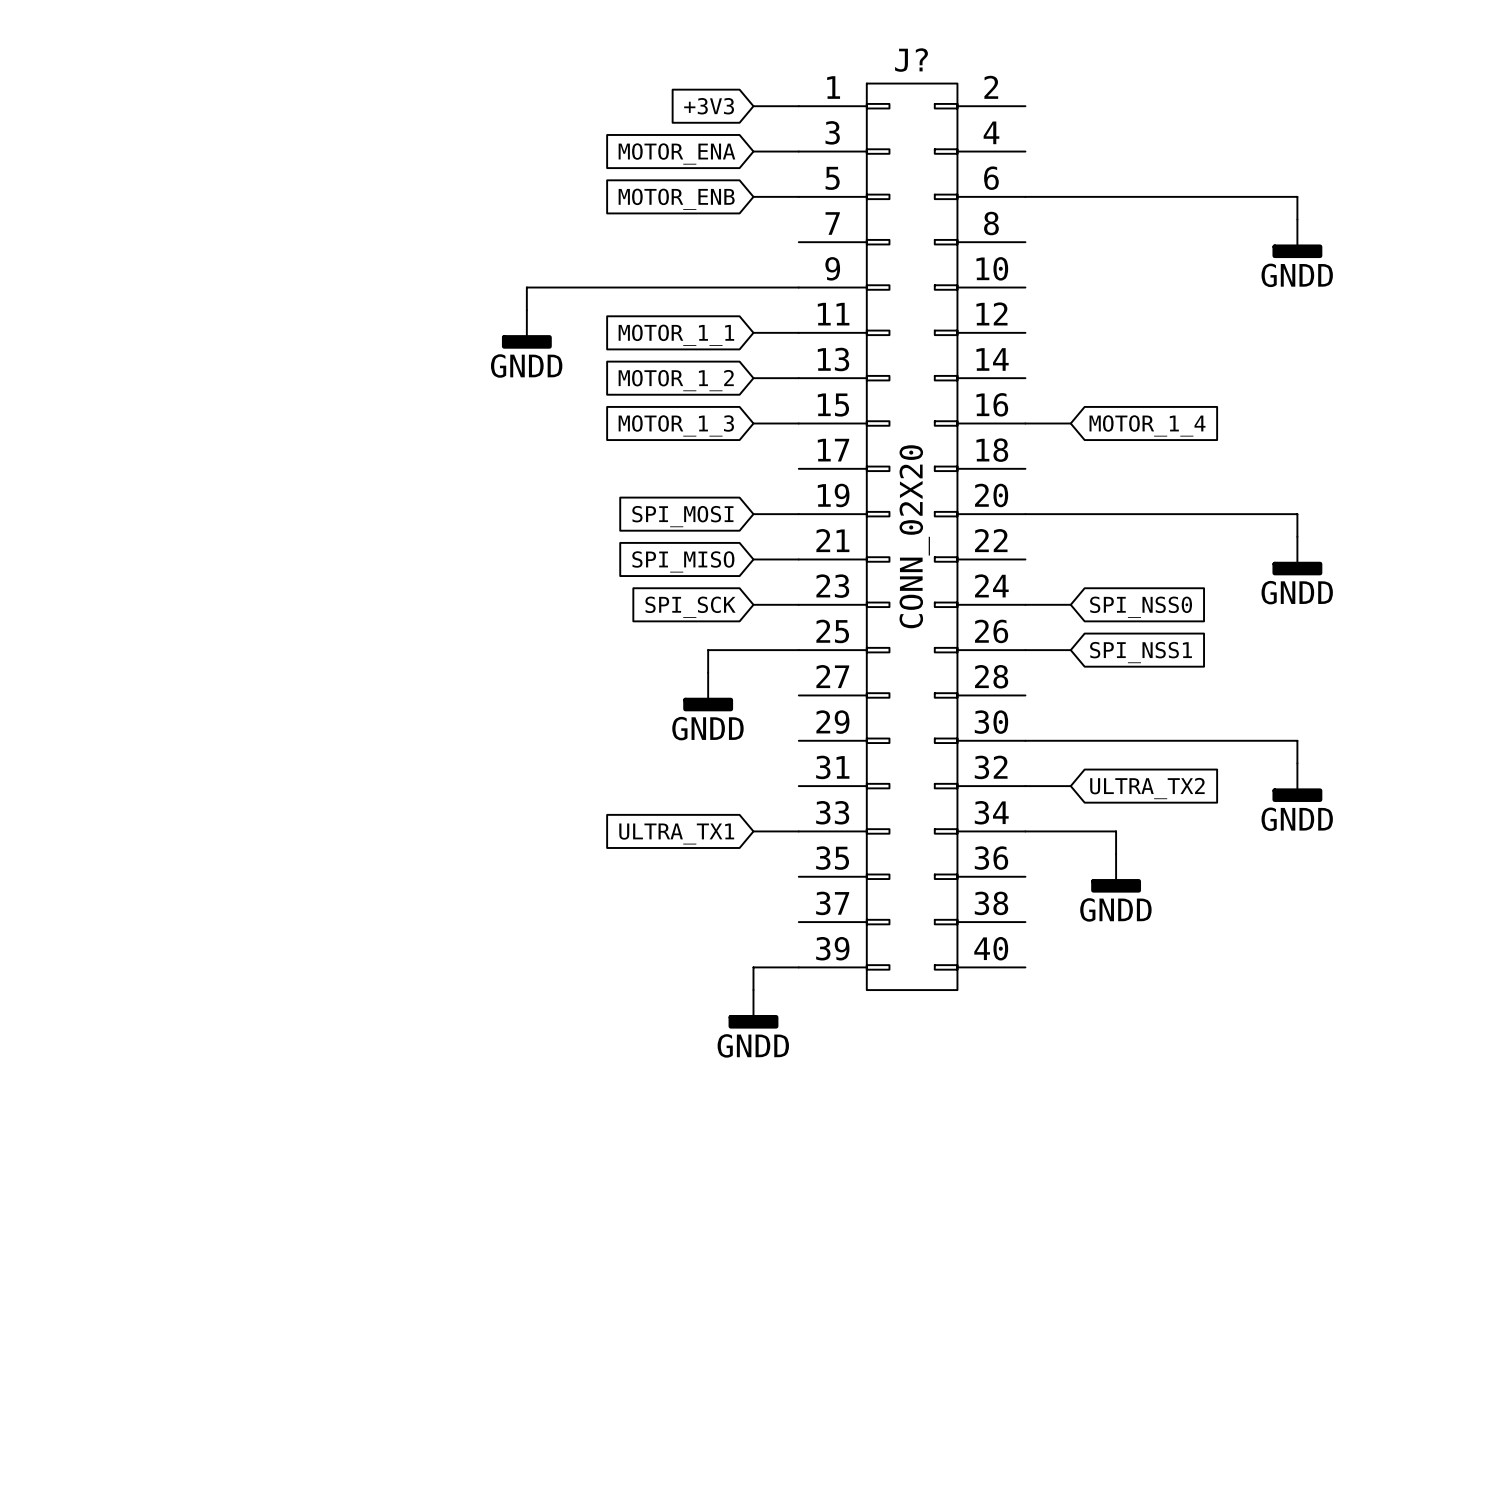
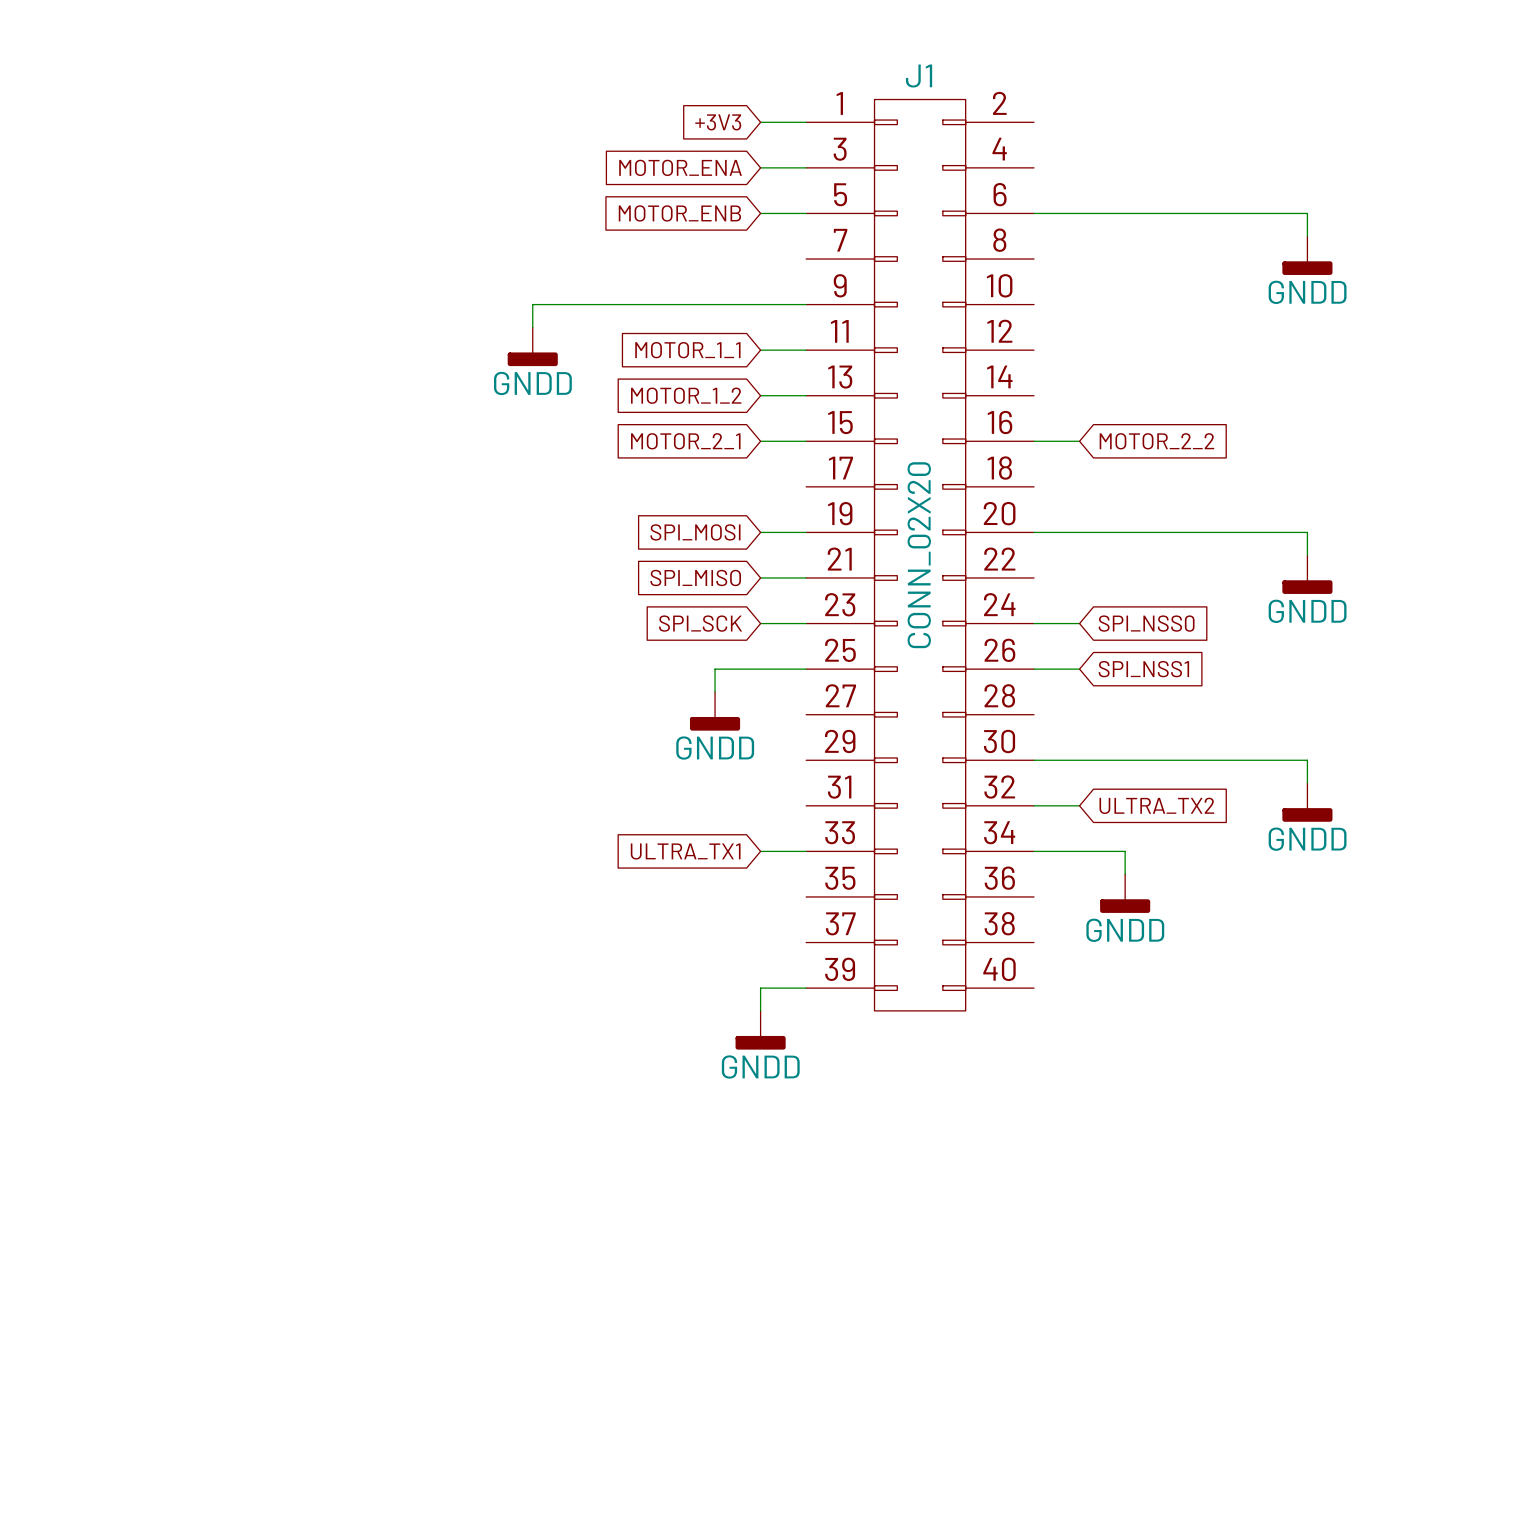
J? name: J? (911, 60) -> J1 (919, 76)
global label: MOTOR_1_3 (676, 425) -> MOTOR_2_1 (685, 441)
global label: MOTOR_1_4 (1147, 425) -> MOTOR_2_2 (1156, 441)

